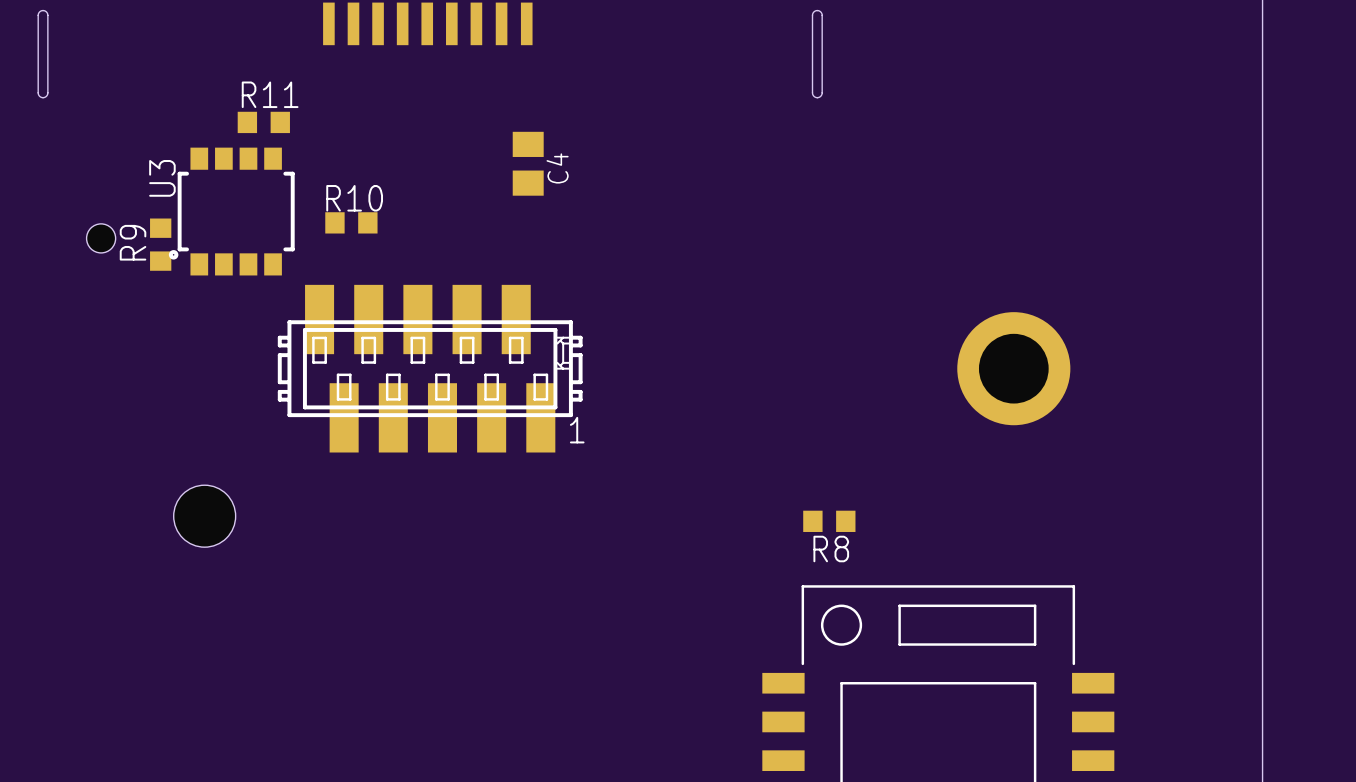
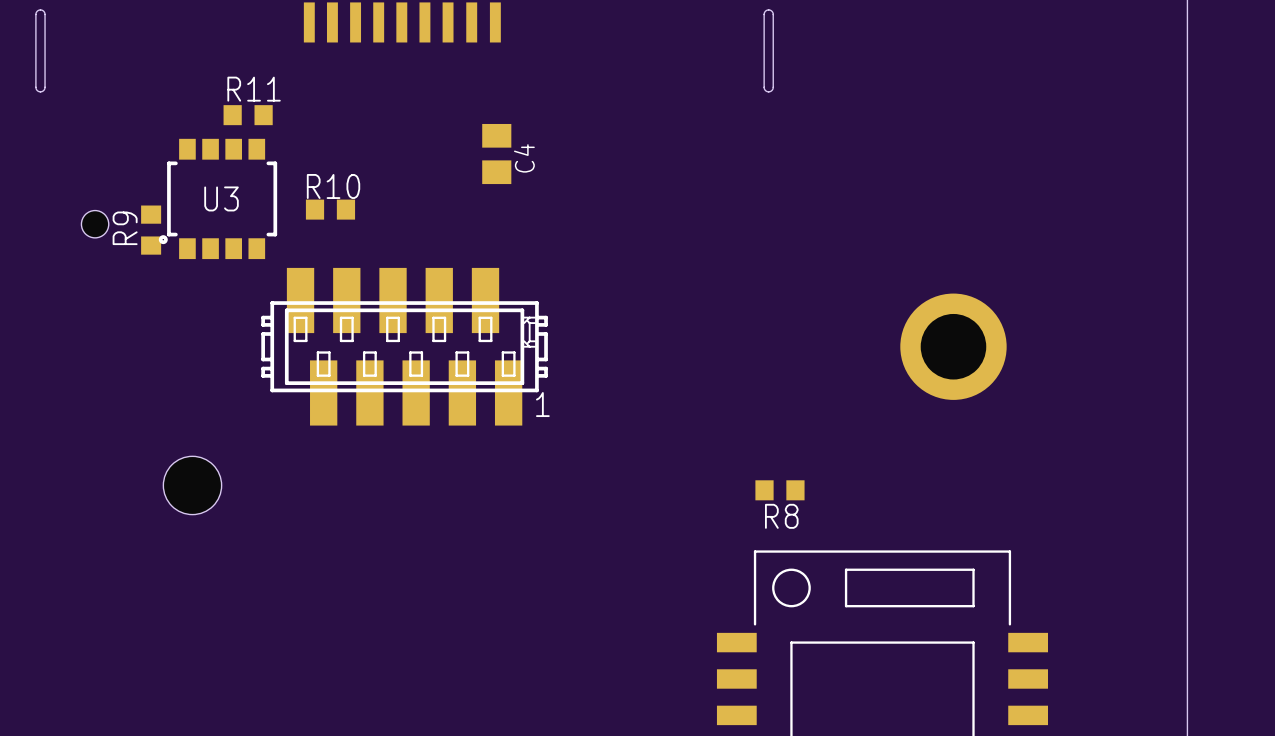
U3 name rotation: 0° (162, 178) -> 90° clockwise (221, 198)
U3 name position: U3 (162, 178) -> U3 (221, 198)

